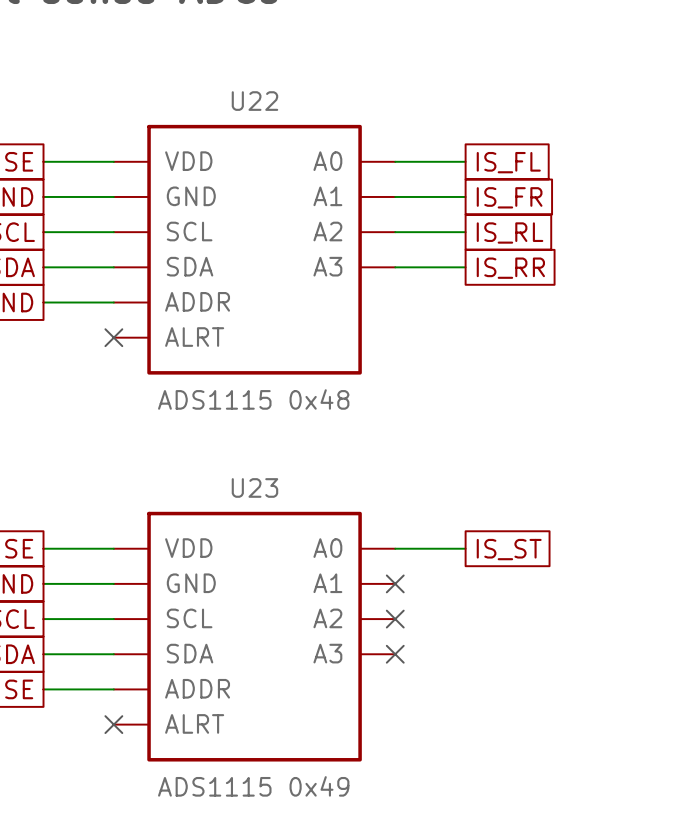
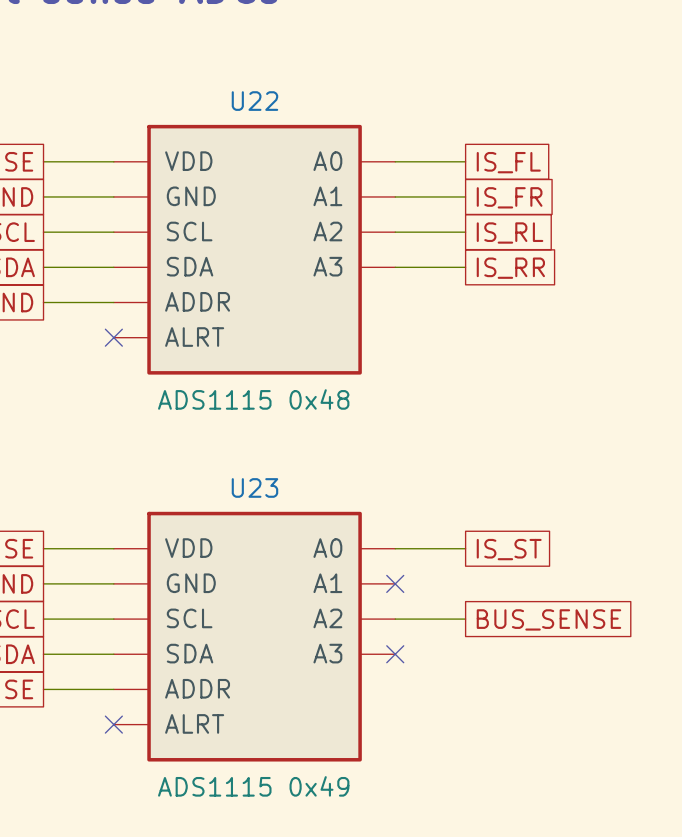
wire: none -> (395, 619) (465, 619)
no-connect mark: (395, 619) -> none
global label: none -> BUS_SENSE (548, 619)

